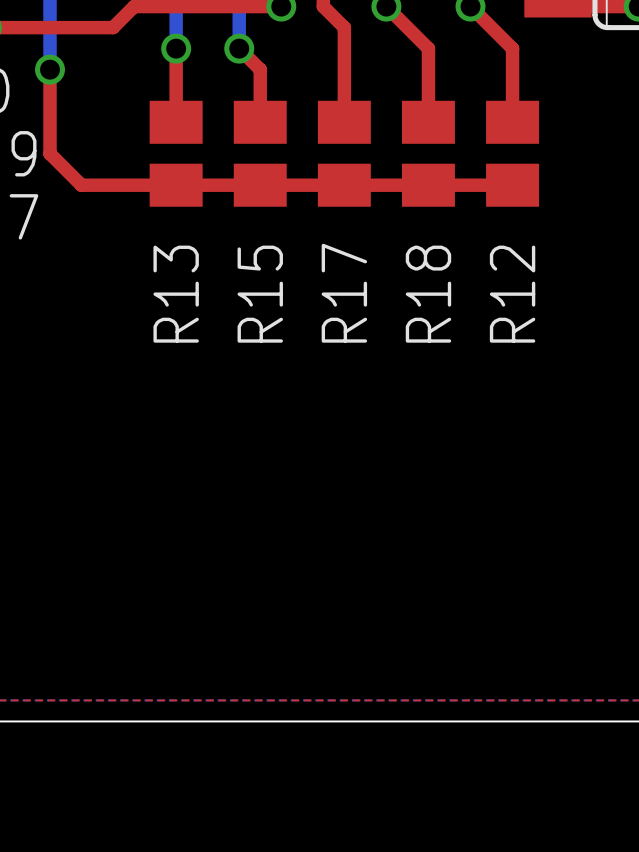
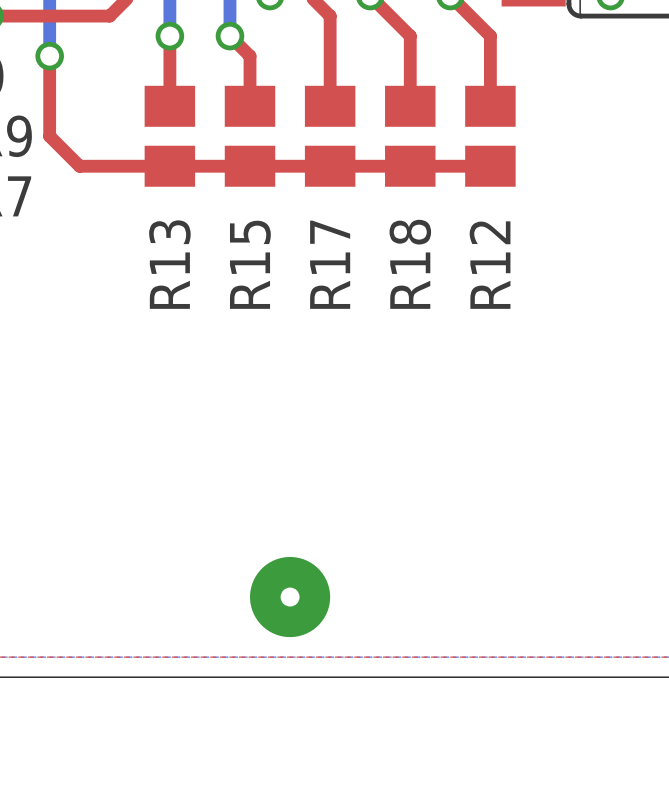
via: none -> (290, 597)

